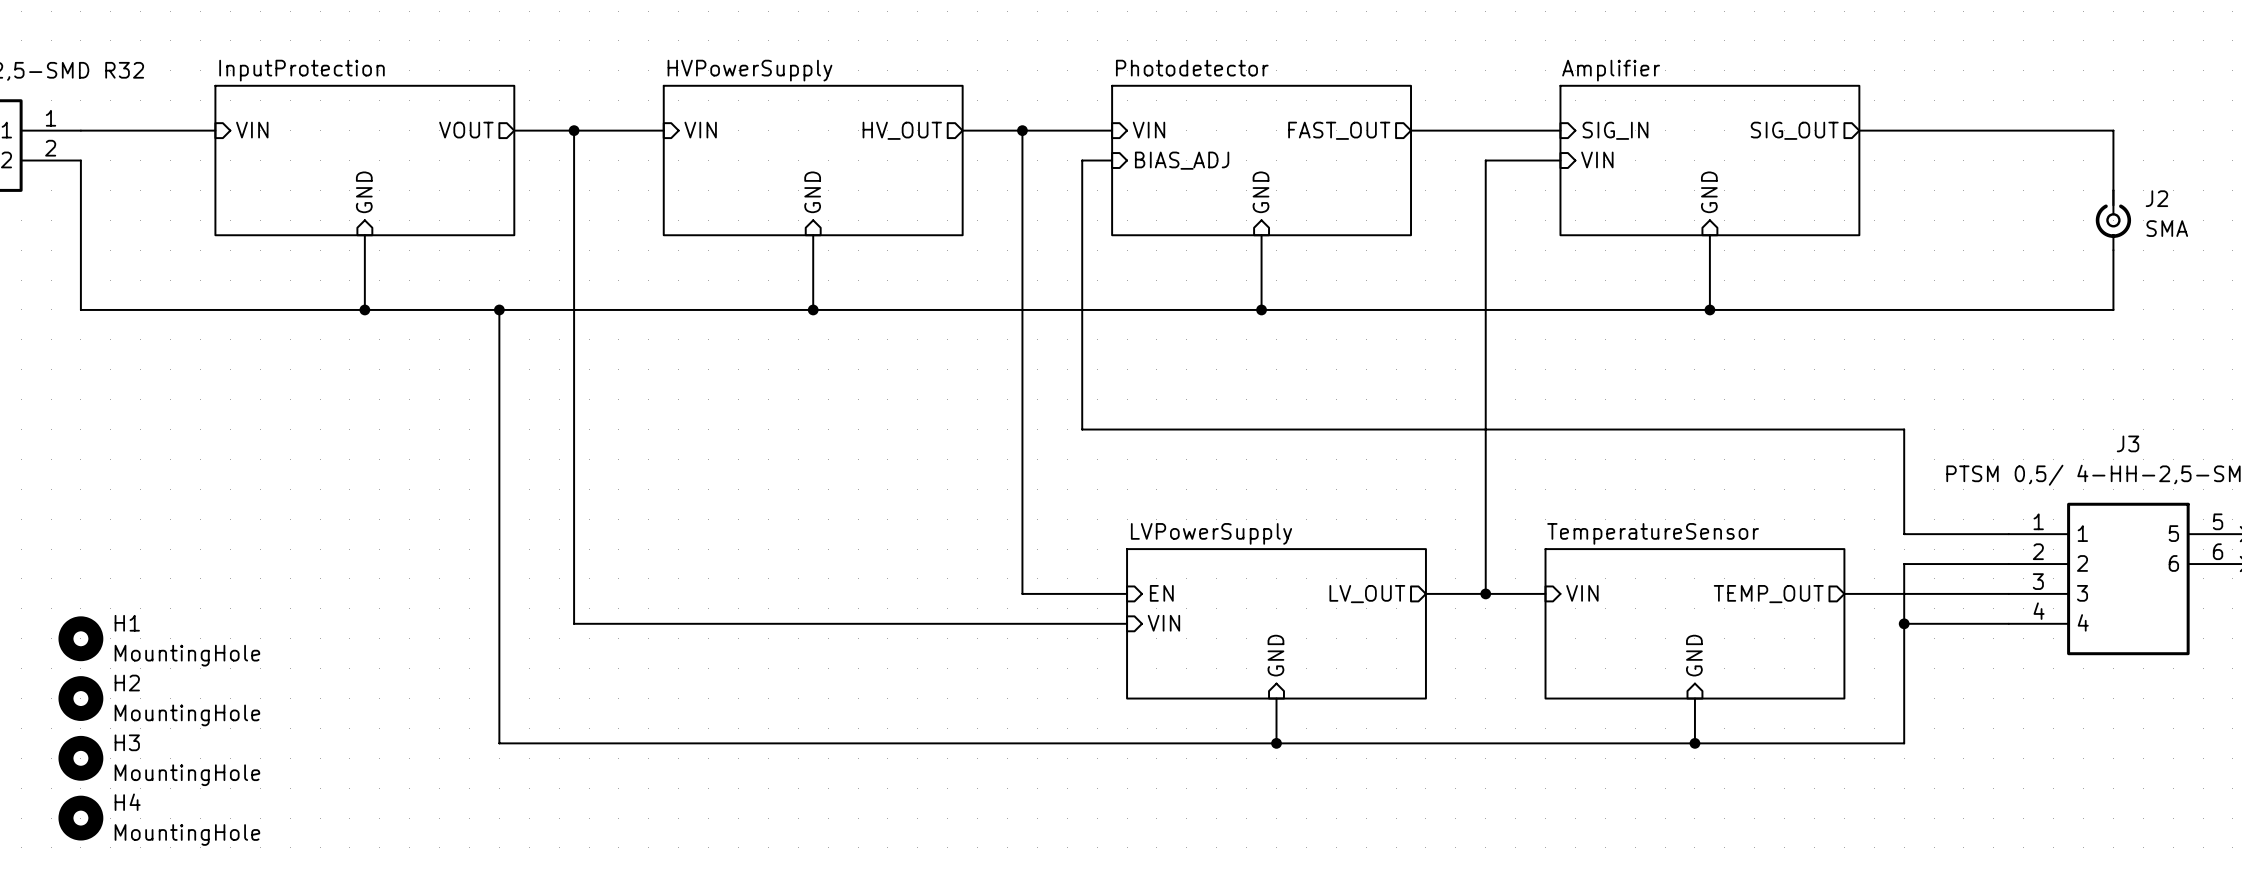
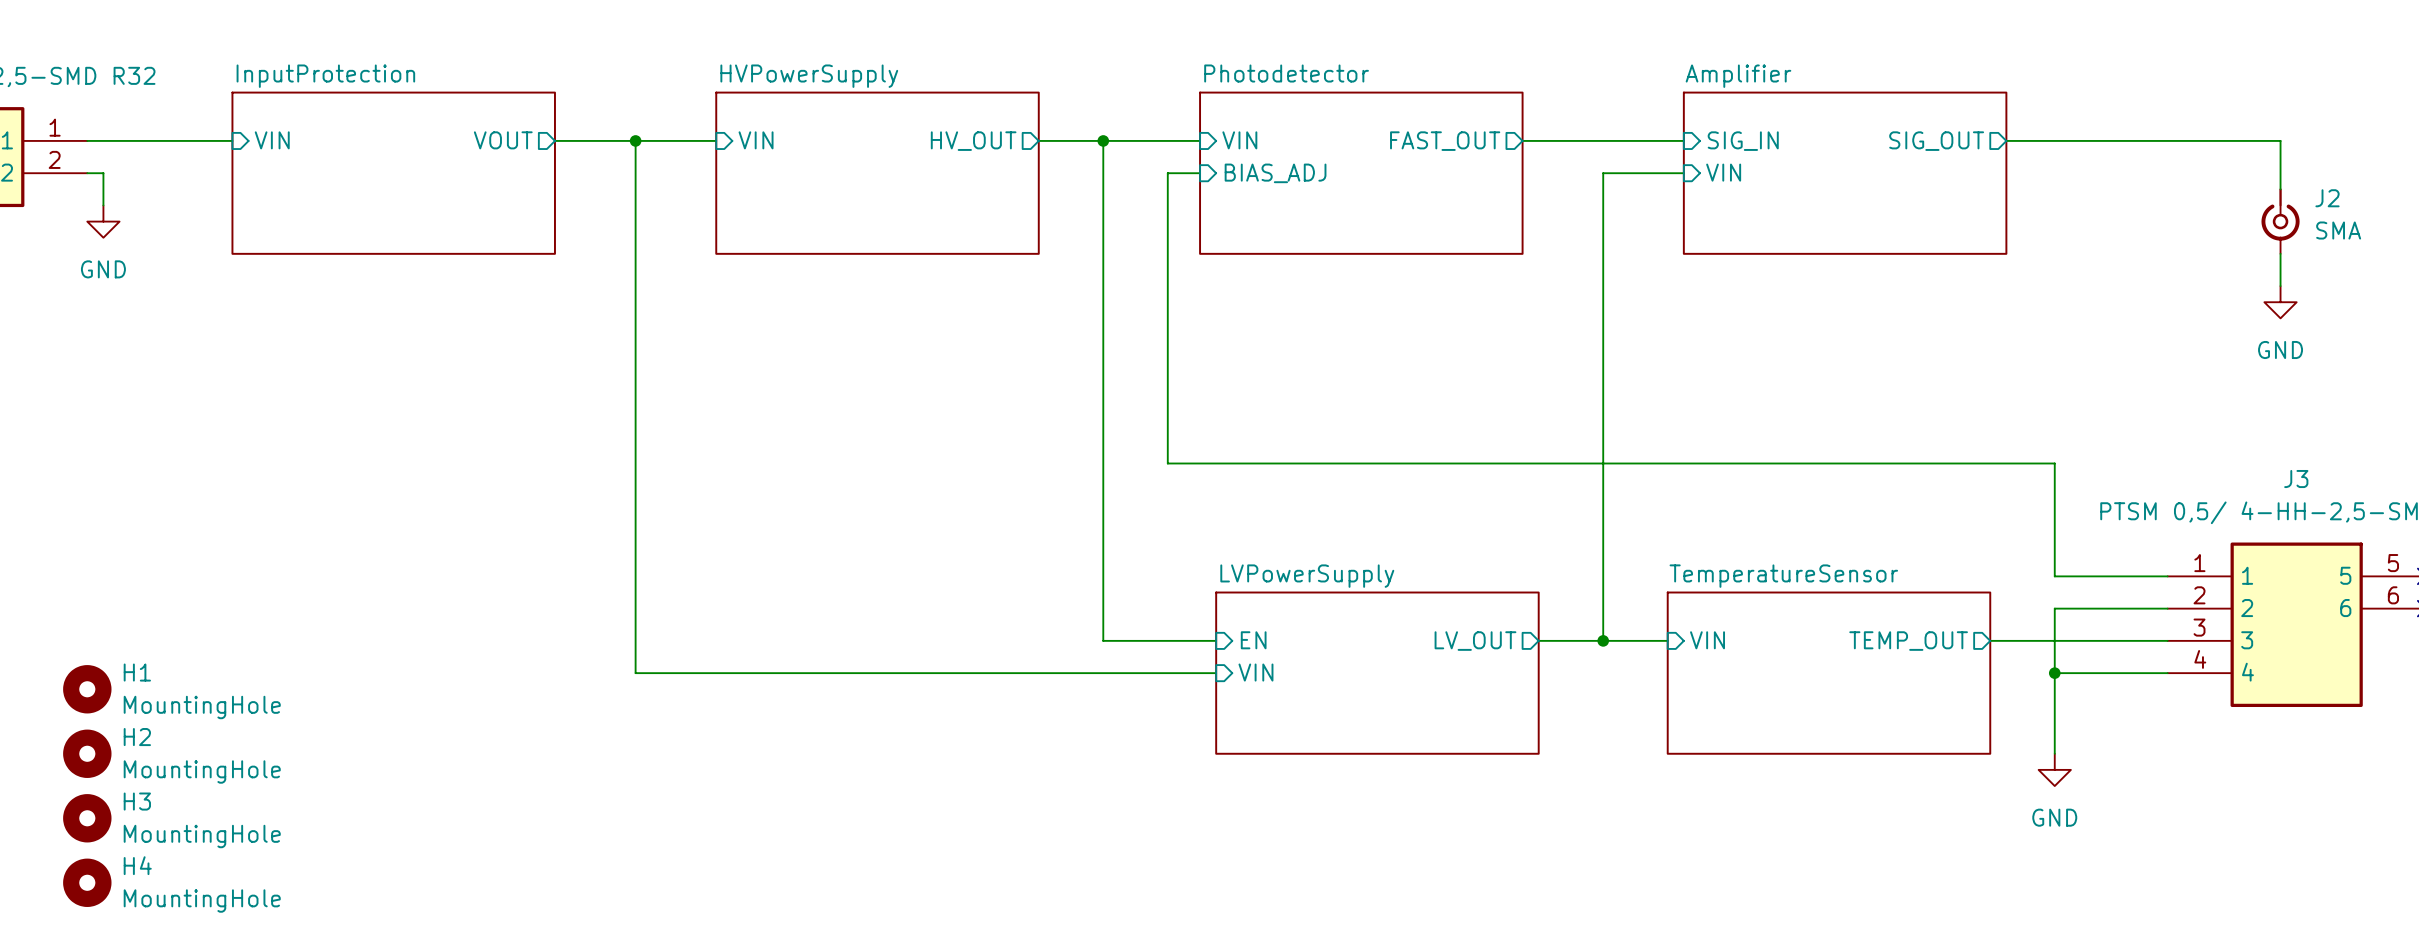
wire: (574, 130) (574, 623) (589, 623) -> (635, 140) (635, 673)
junction position: (574, 130) -> (635, 140)
wire: (80, 160) (80, 309) (2113, 309) (2113, 265) -> (87, 173) (103, 173) (103, 205)
sheet pin: GND (364, 192) -> none
sheet pin: GND (812, 192) -> none
sheet pin: GND (1261, 192) -> none
sheet pin: GND (1709, 192) -> none
power symbol: none -> GND (103, 221)
J2 position: (2113, 220) -> (2280, 221)
wire: (364, 235) (364, 309) -> none
wire: (813, 235) (813, 309) -> none
wire: (1261, 235) (1261, 309) -> none
wire: (1709, 235) (1709, 309) -> none
power symbol: none -> GND (2280, 302)
junction: (364, 309) -> none
wire: (499, 309) (499, 743) (1904, 743) (1904, 698) -> none
junction: (499, 309) -> none
junction: (813, 309) -> none
junction: (1261, 309) -> none
junction: (1709, 309) -> none
sheet pin: GND (1275, 655) -> none
sheet pin: GND (1694, 655) -> none
wire: (1276, 698) (1276, 743) -> none
wire: (1694, 698) (1694, 743) -> none
power symbol: none -> GND (2054, 769)
junction: (1276, 743) -> none
junction: (1694, 743) -> none

